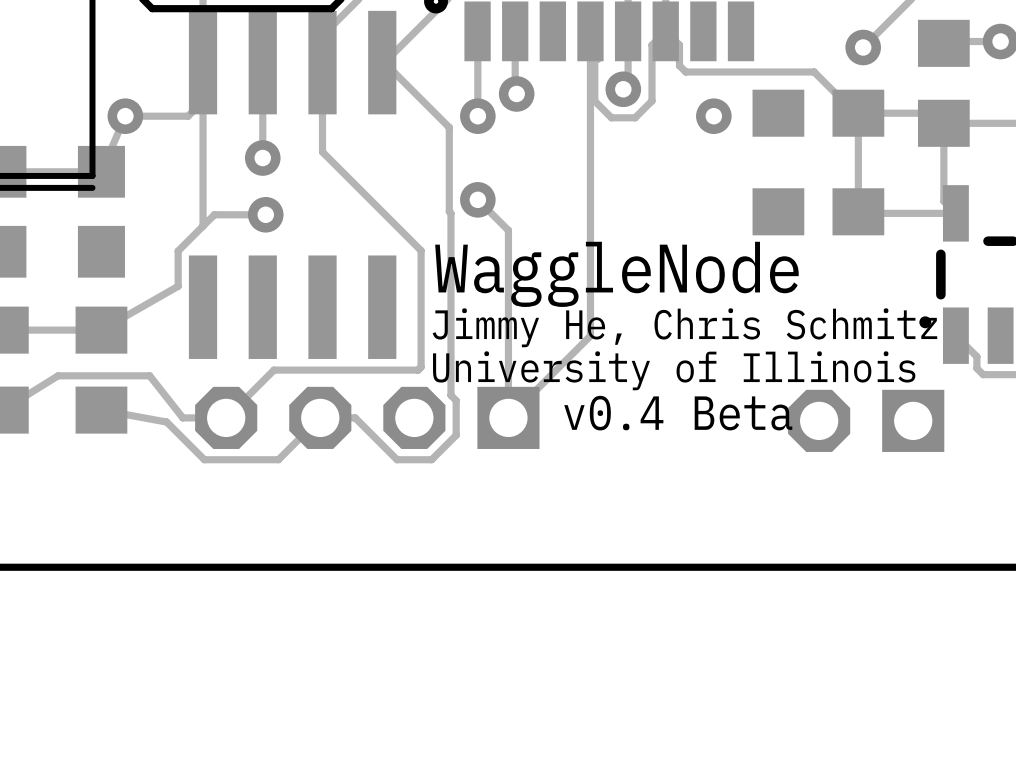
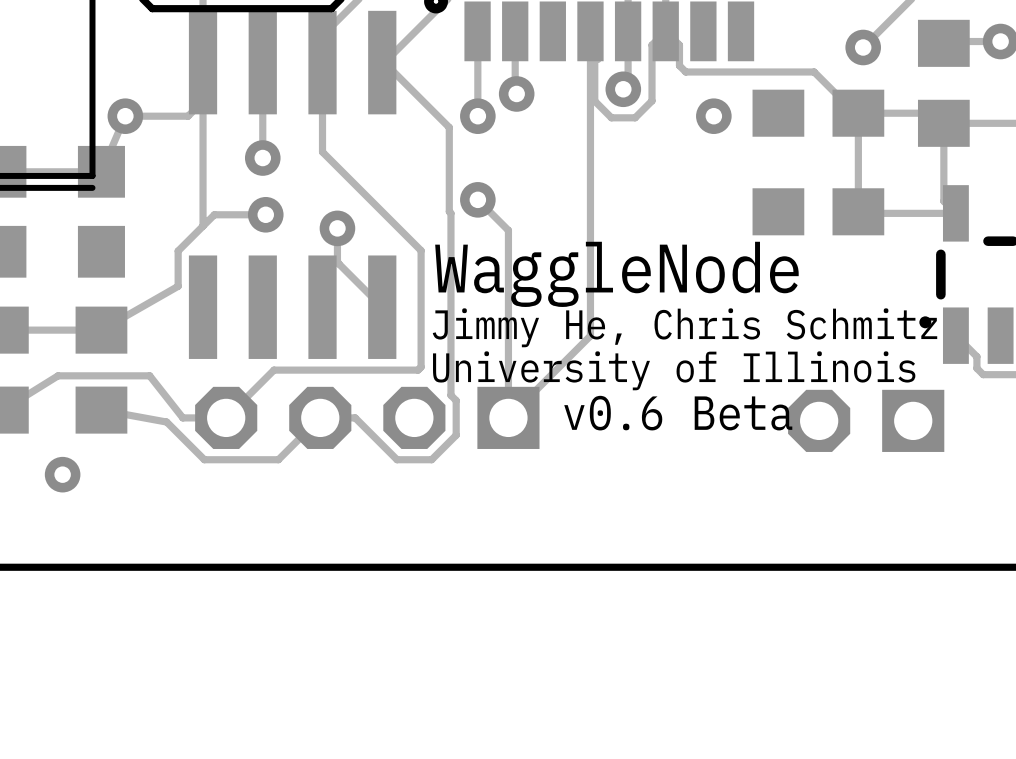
track: none -> (337, 228) (338, 262) (382, 307)
via: none -> (337, 228)
text: v0.4 Beta (678, 413) -> v0.6 Beta (678, 413)
via: none -> (62, 474)

